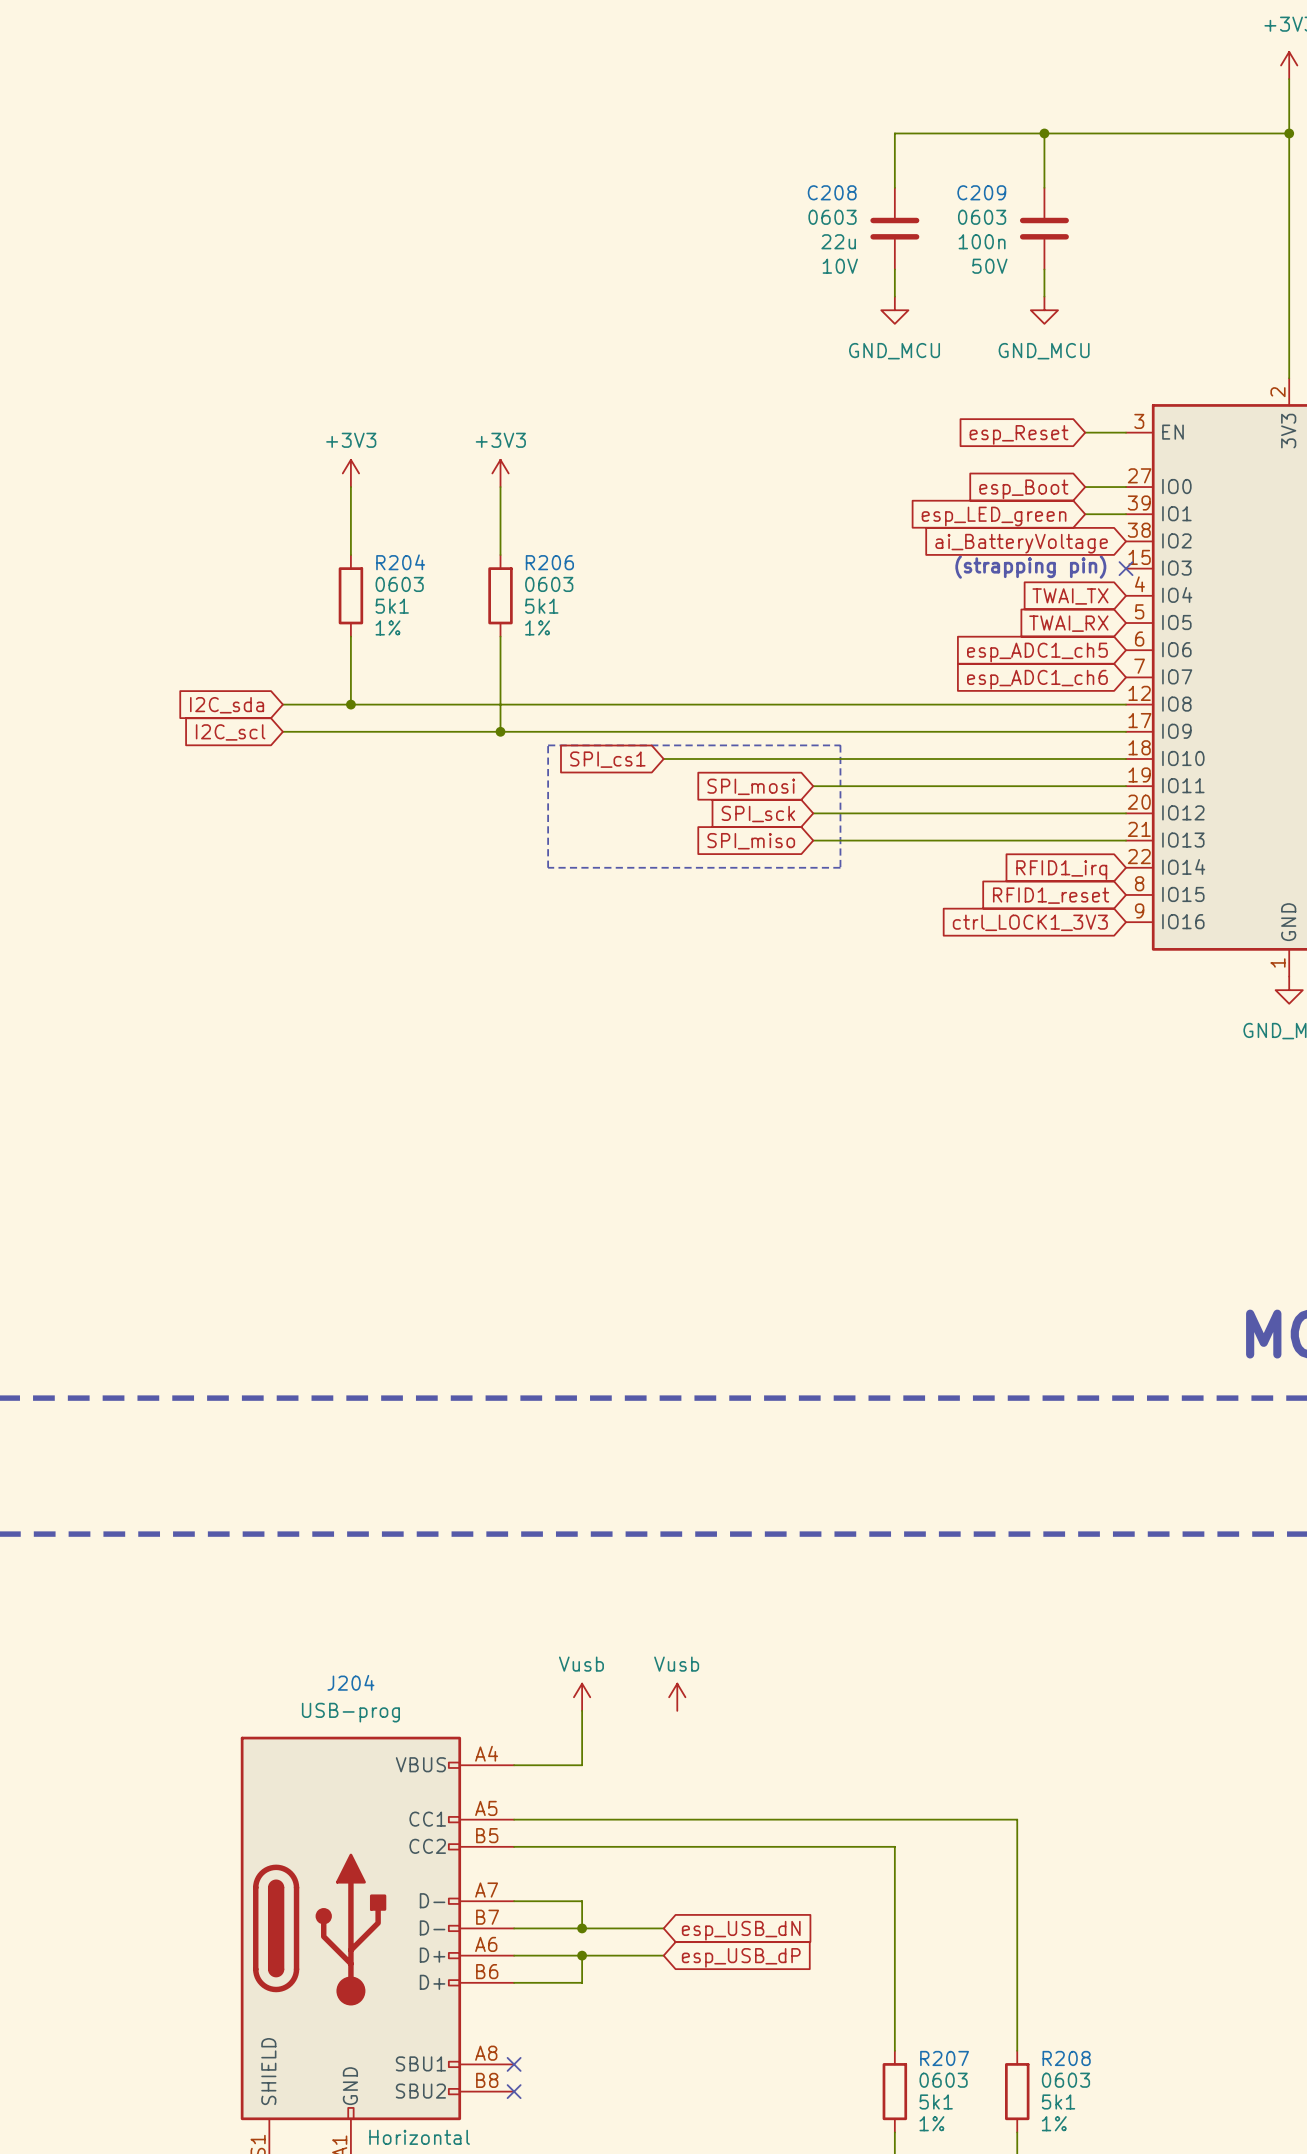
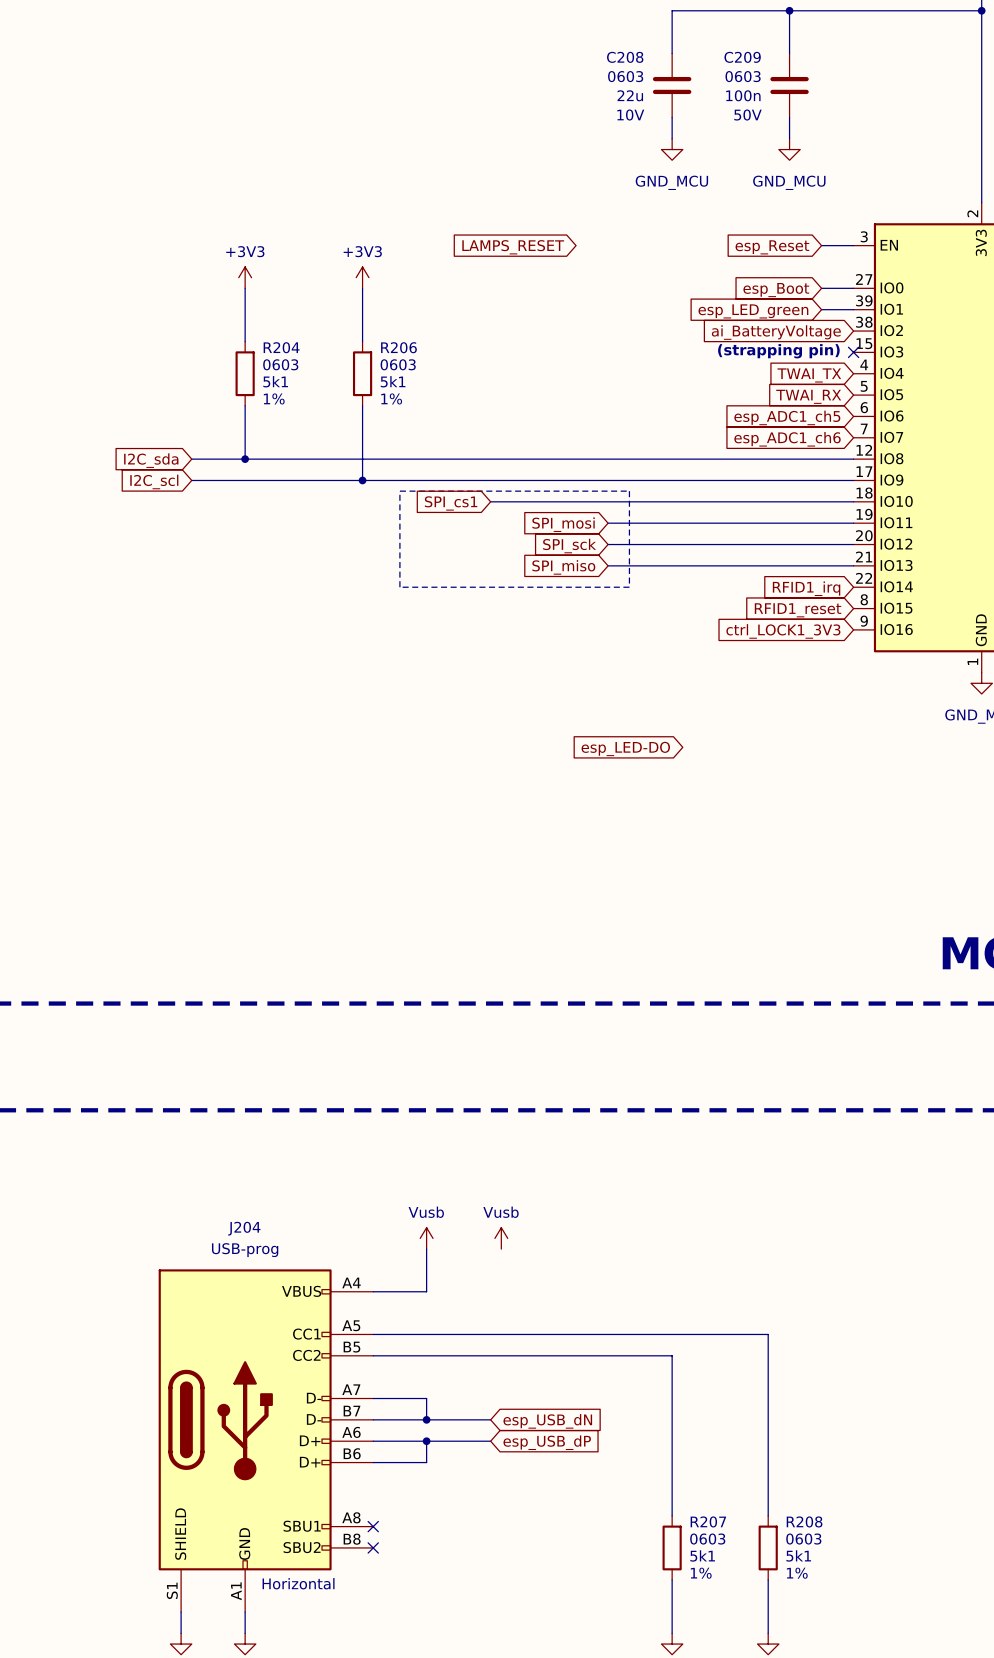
global label: none -> LAMPS_RESET (513, 247)
global label: none -> esp_LED-DO (625, 748)

